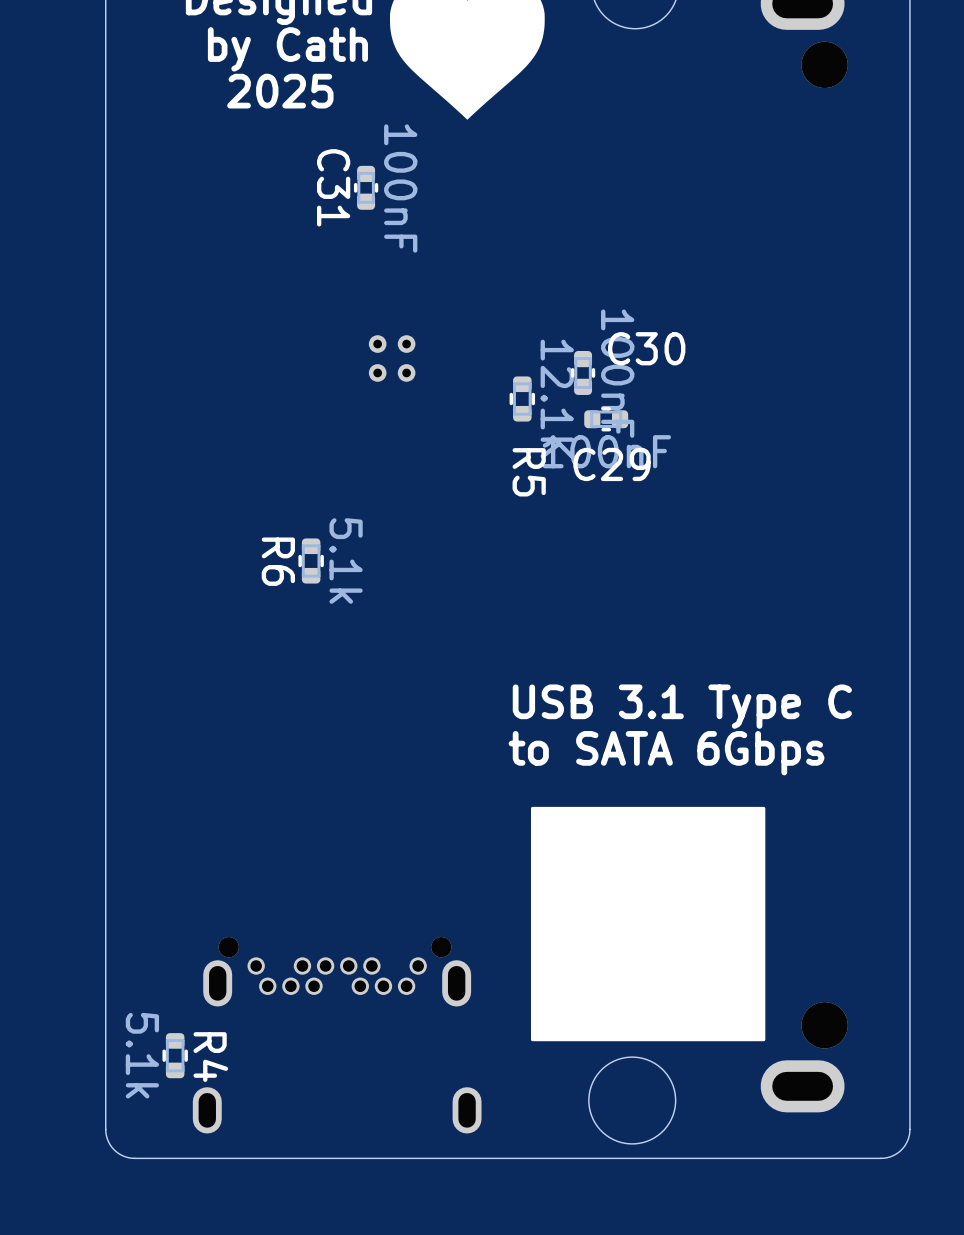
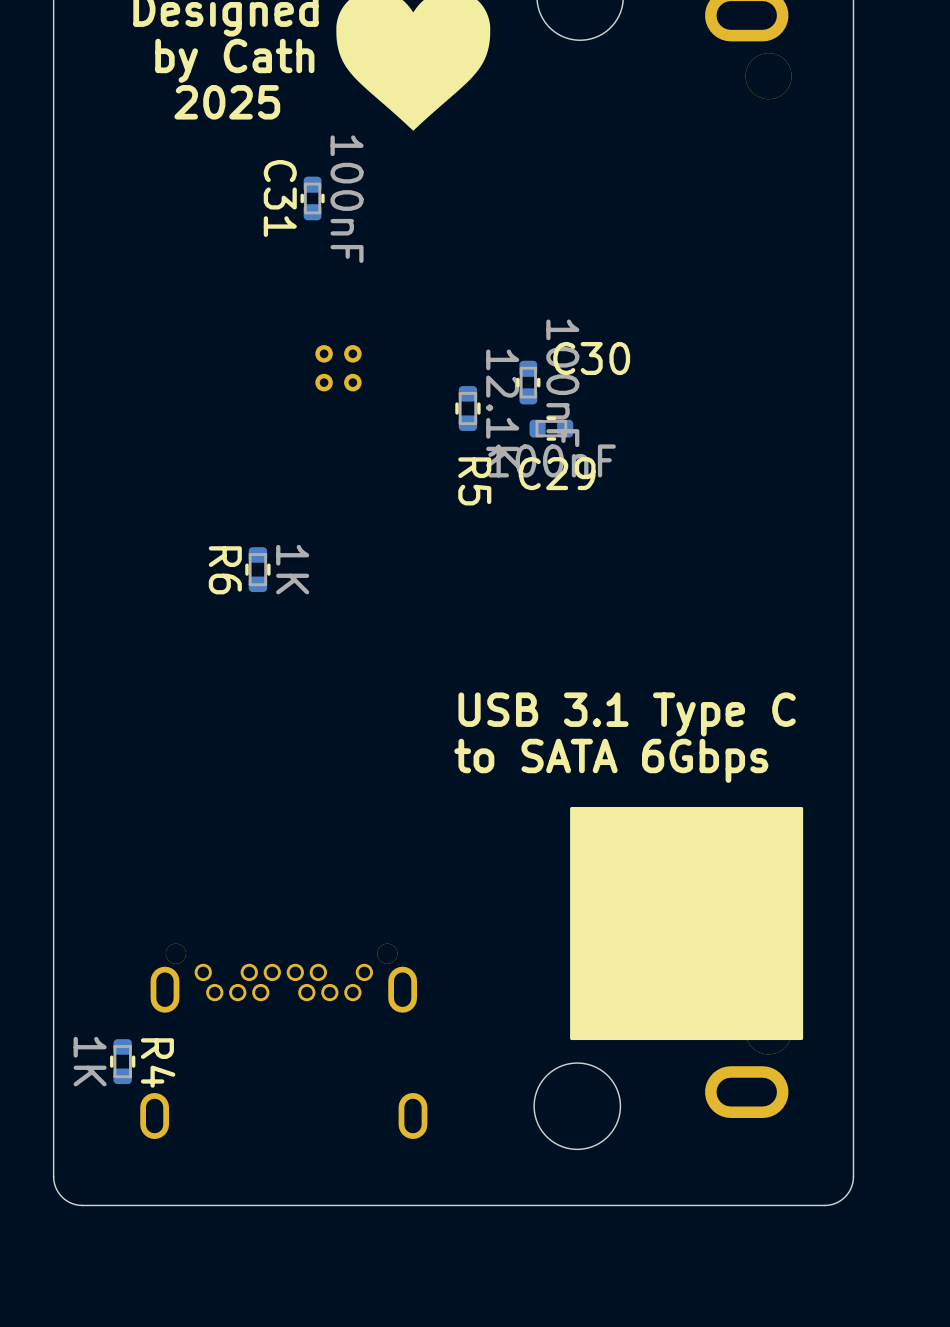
R6 value: 5.1k (346, 561) -> 1K (292, 569)
drawing position: (648, 924) -> (686, 923)
R4 value: 5.1k (142, 1055) -> 1K (90, 1061)
board edge: (909, 1129) (908, 1139) (901, 1149) (890, 1156) (881, 1158) (134, 1158) (125, 1156) (114, 1149) (108, 1141) (105, 1129) -> (853, 1134) (851, 1186) (842, 1199) (834, 1203) (824, 1205) (79, 1205) (64, 1199) (55, 1186) (53, 1134)

